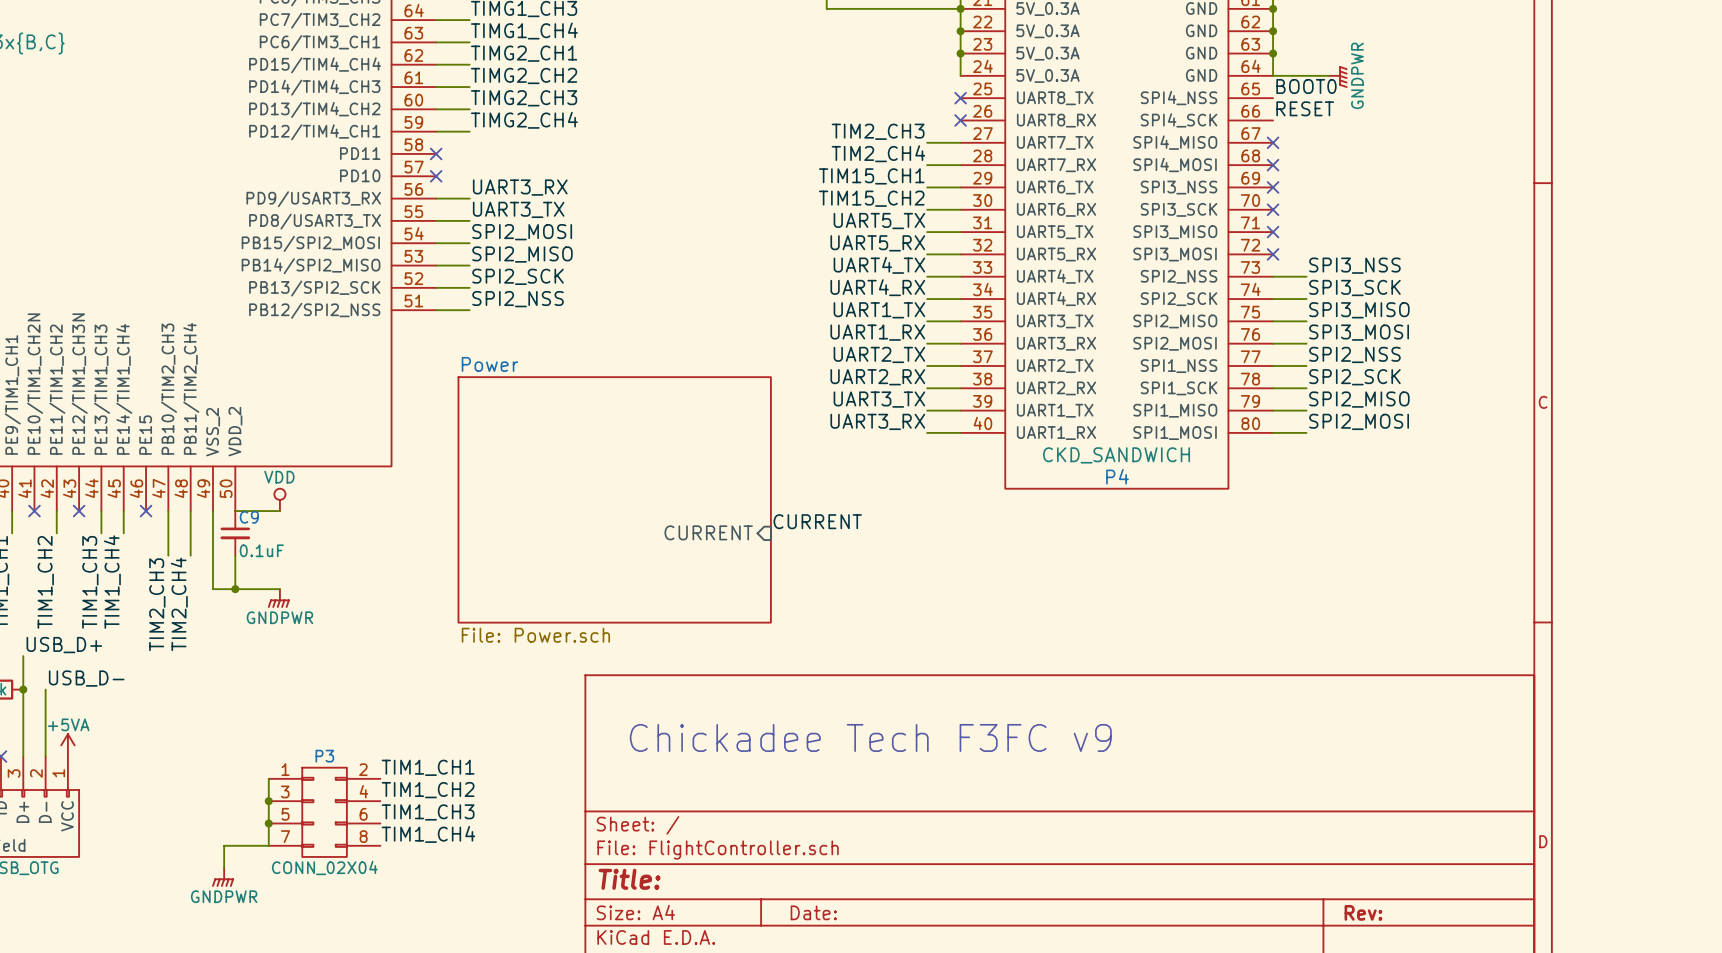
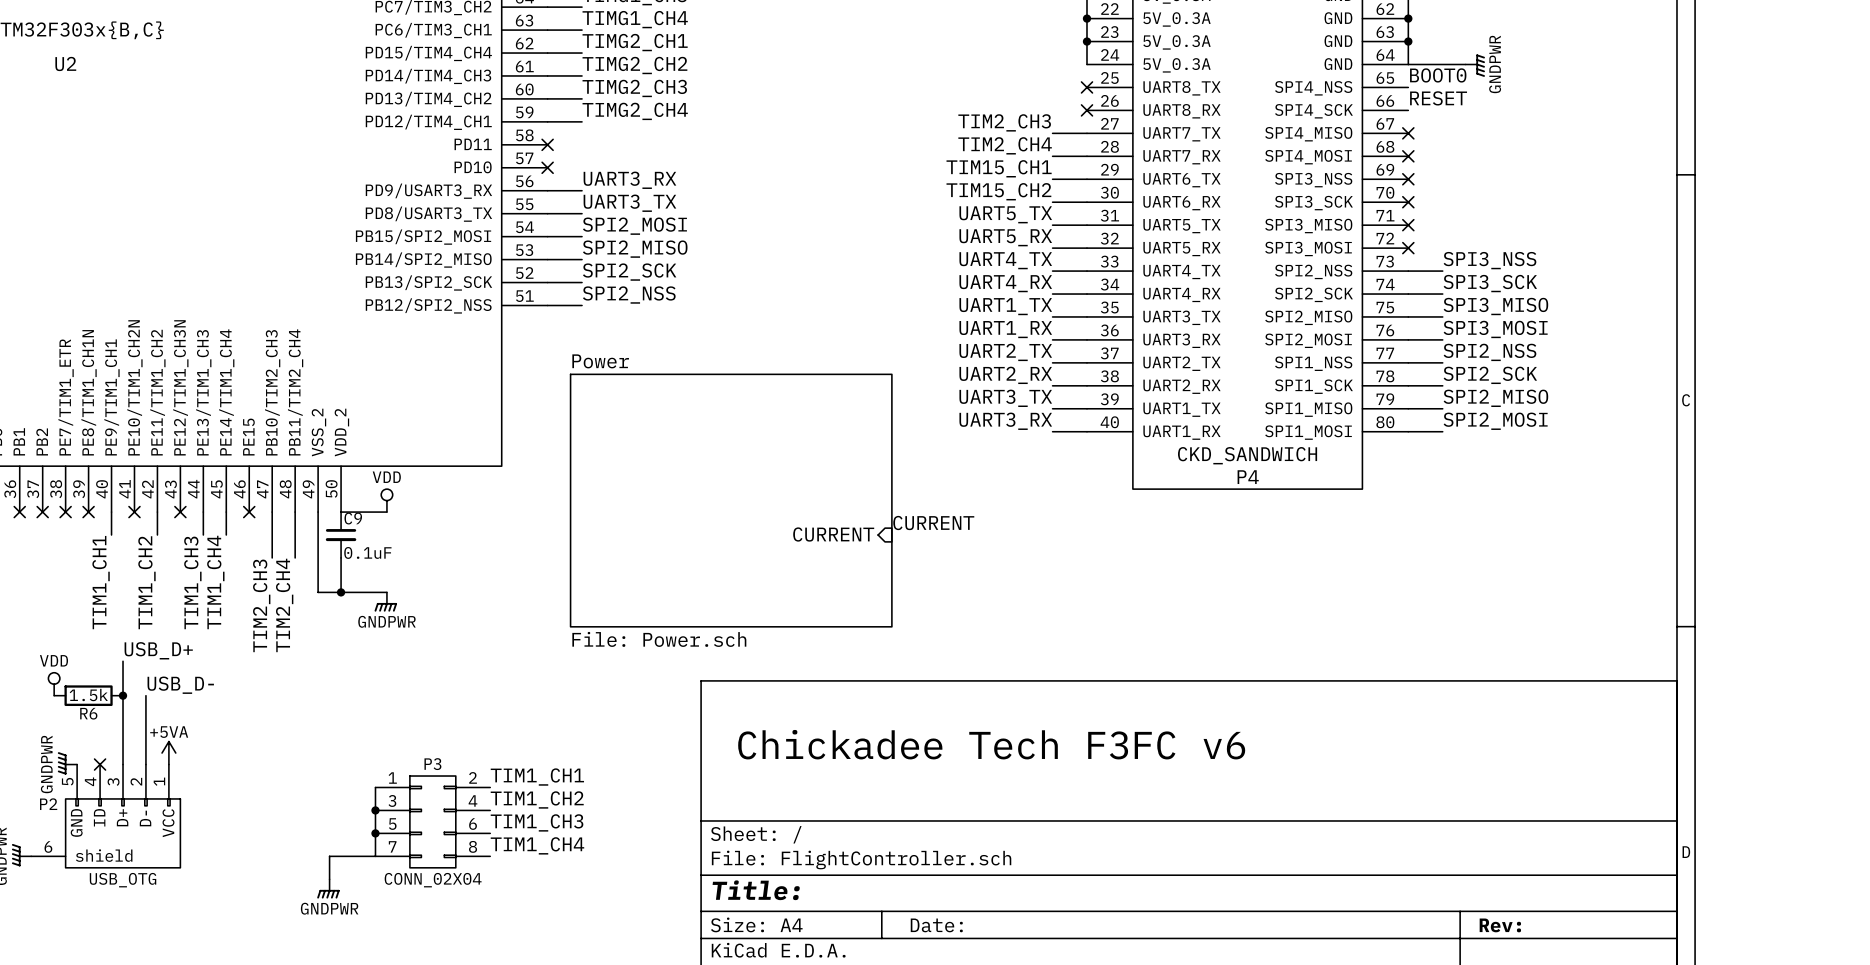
text: Chickadee Tech F3FC v9 (870, 737) -> Chickadee Tech F3FC v6 (991, 744)

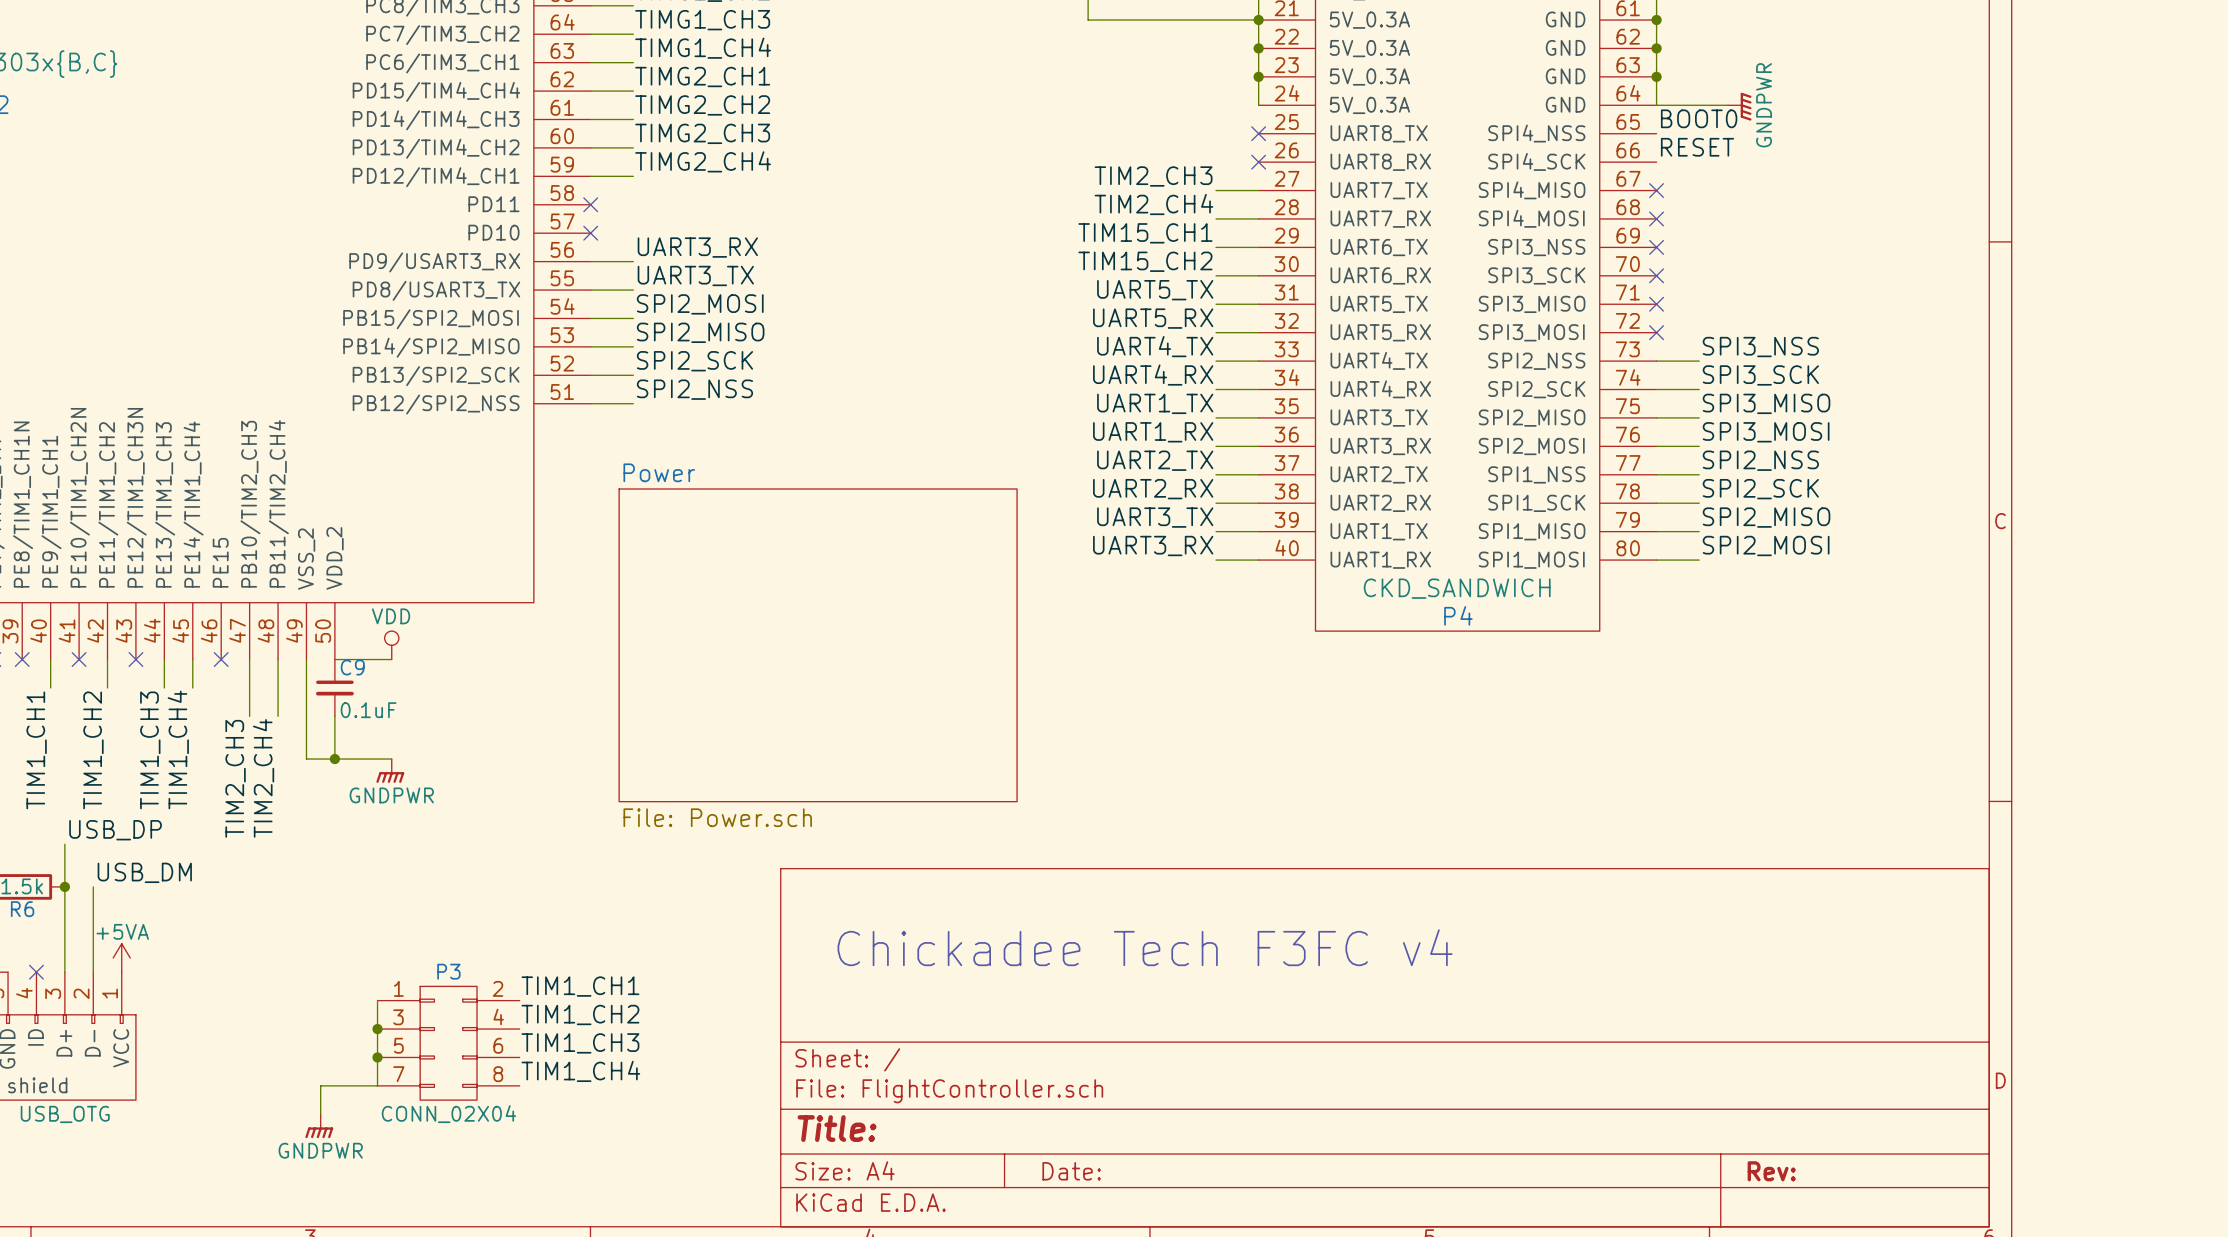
label: CURRENT (933, 523) -> none
sheet pin: CURRENT (833, 534) -> none
label: USB_D+ (158, 650) -> USB_DP (115, 830)
label: USB_D- (180, 685) -> USB_DM (144, 872)
text: Chickadee Tech F3FC v6 (991, 744) -> Chickadee Tech F3FC v4 (1145, 947)

